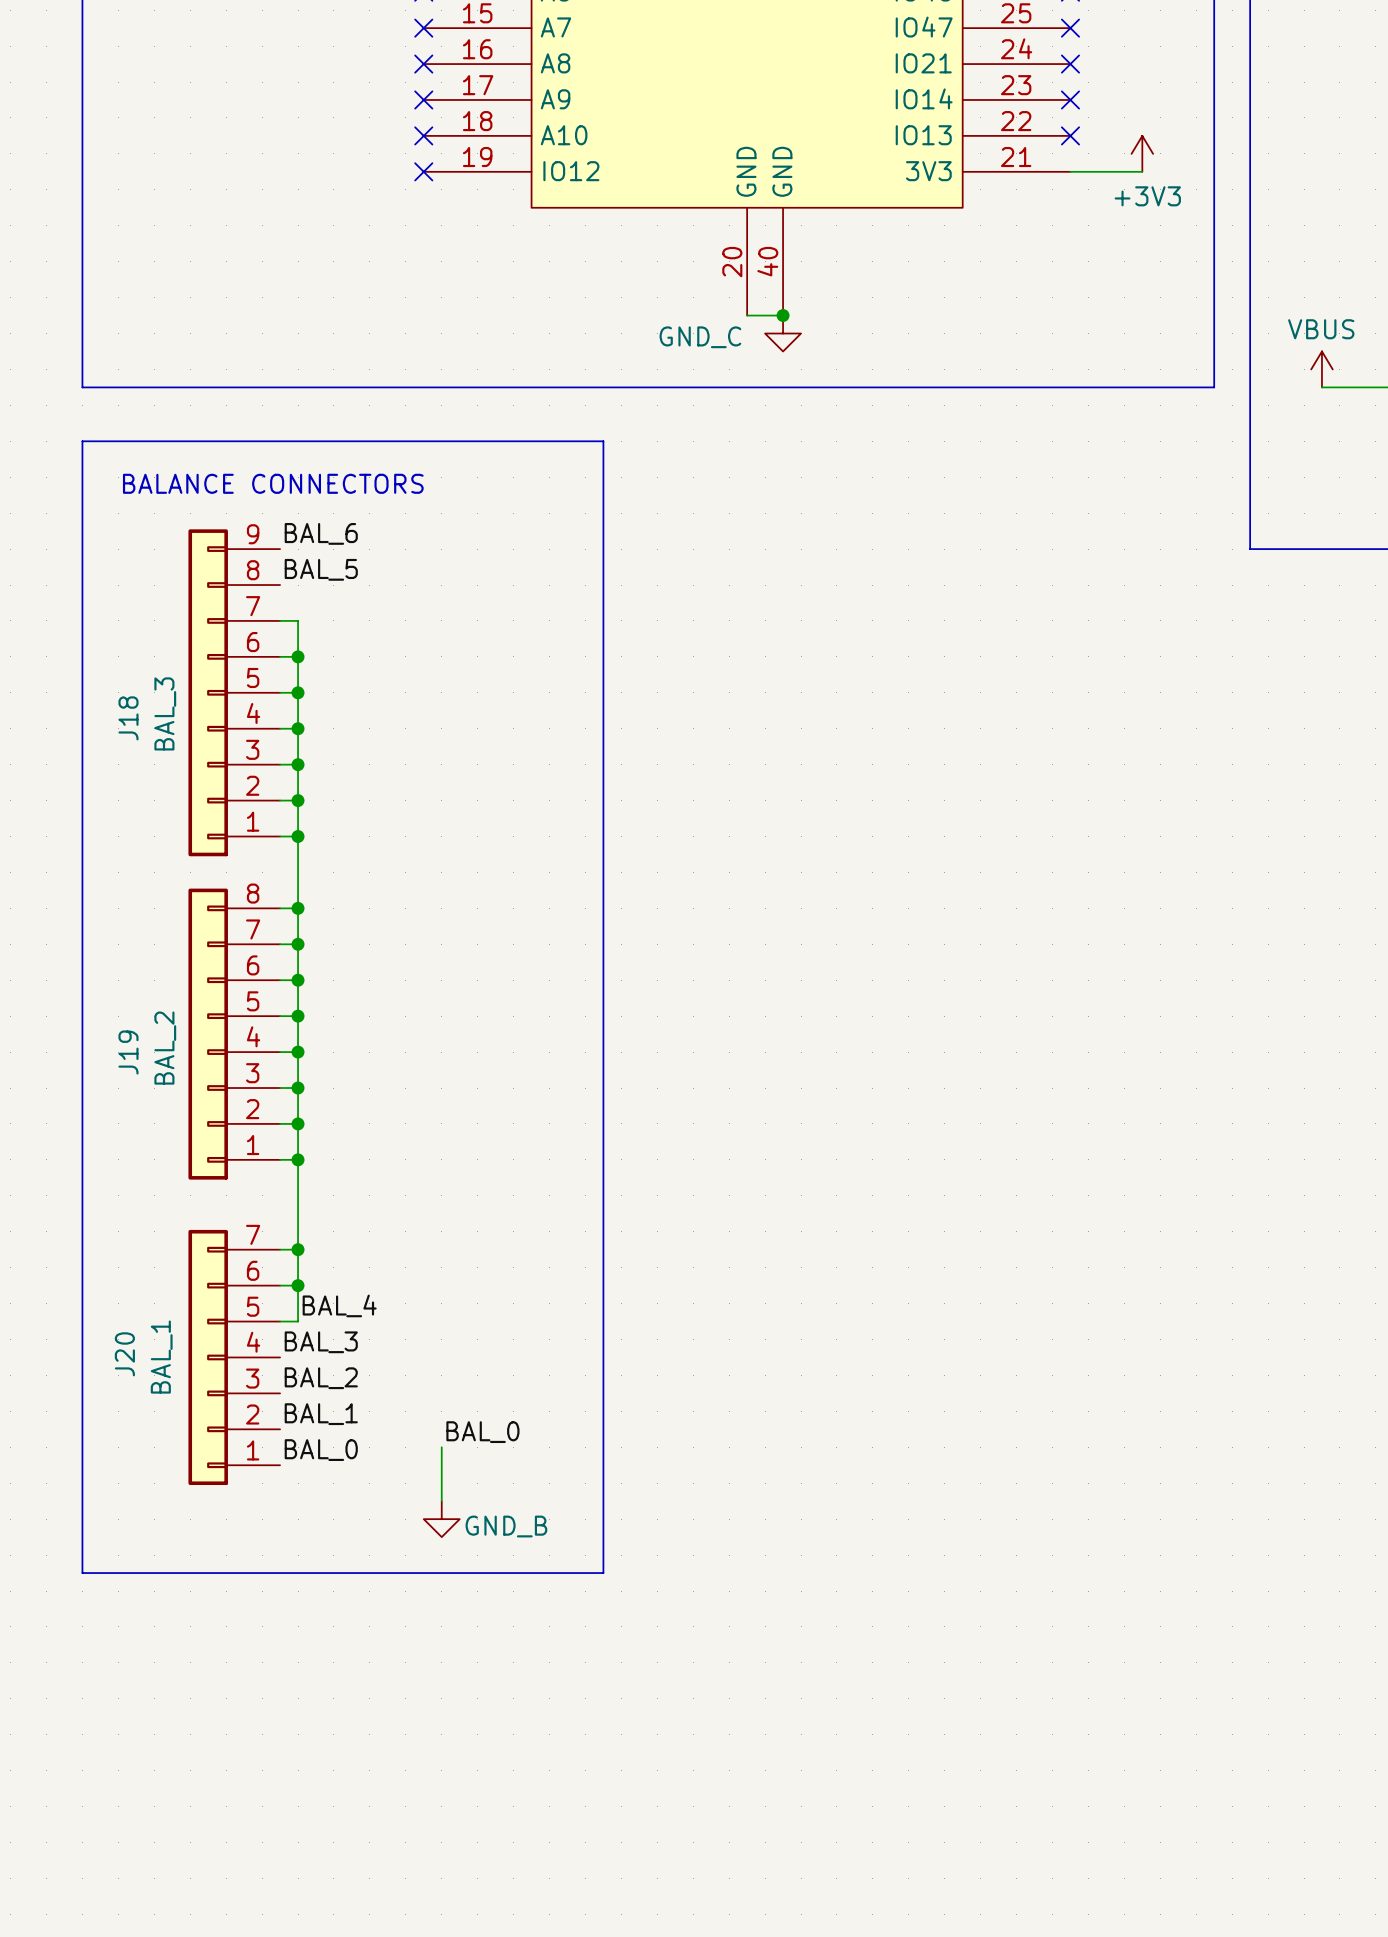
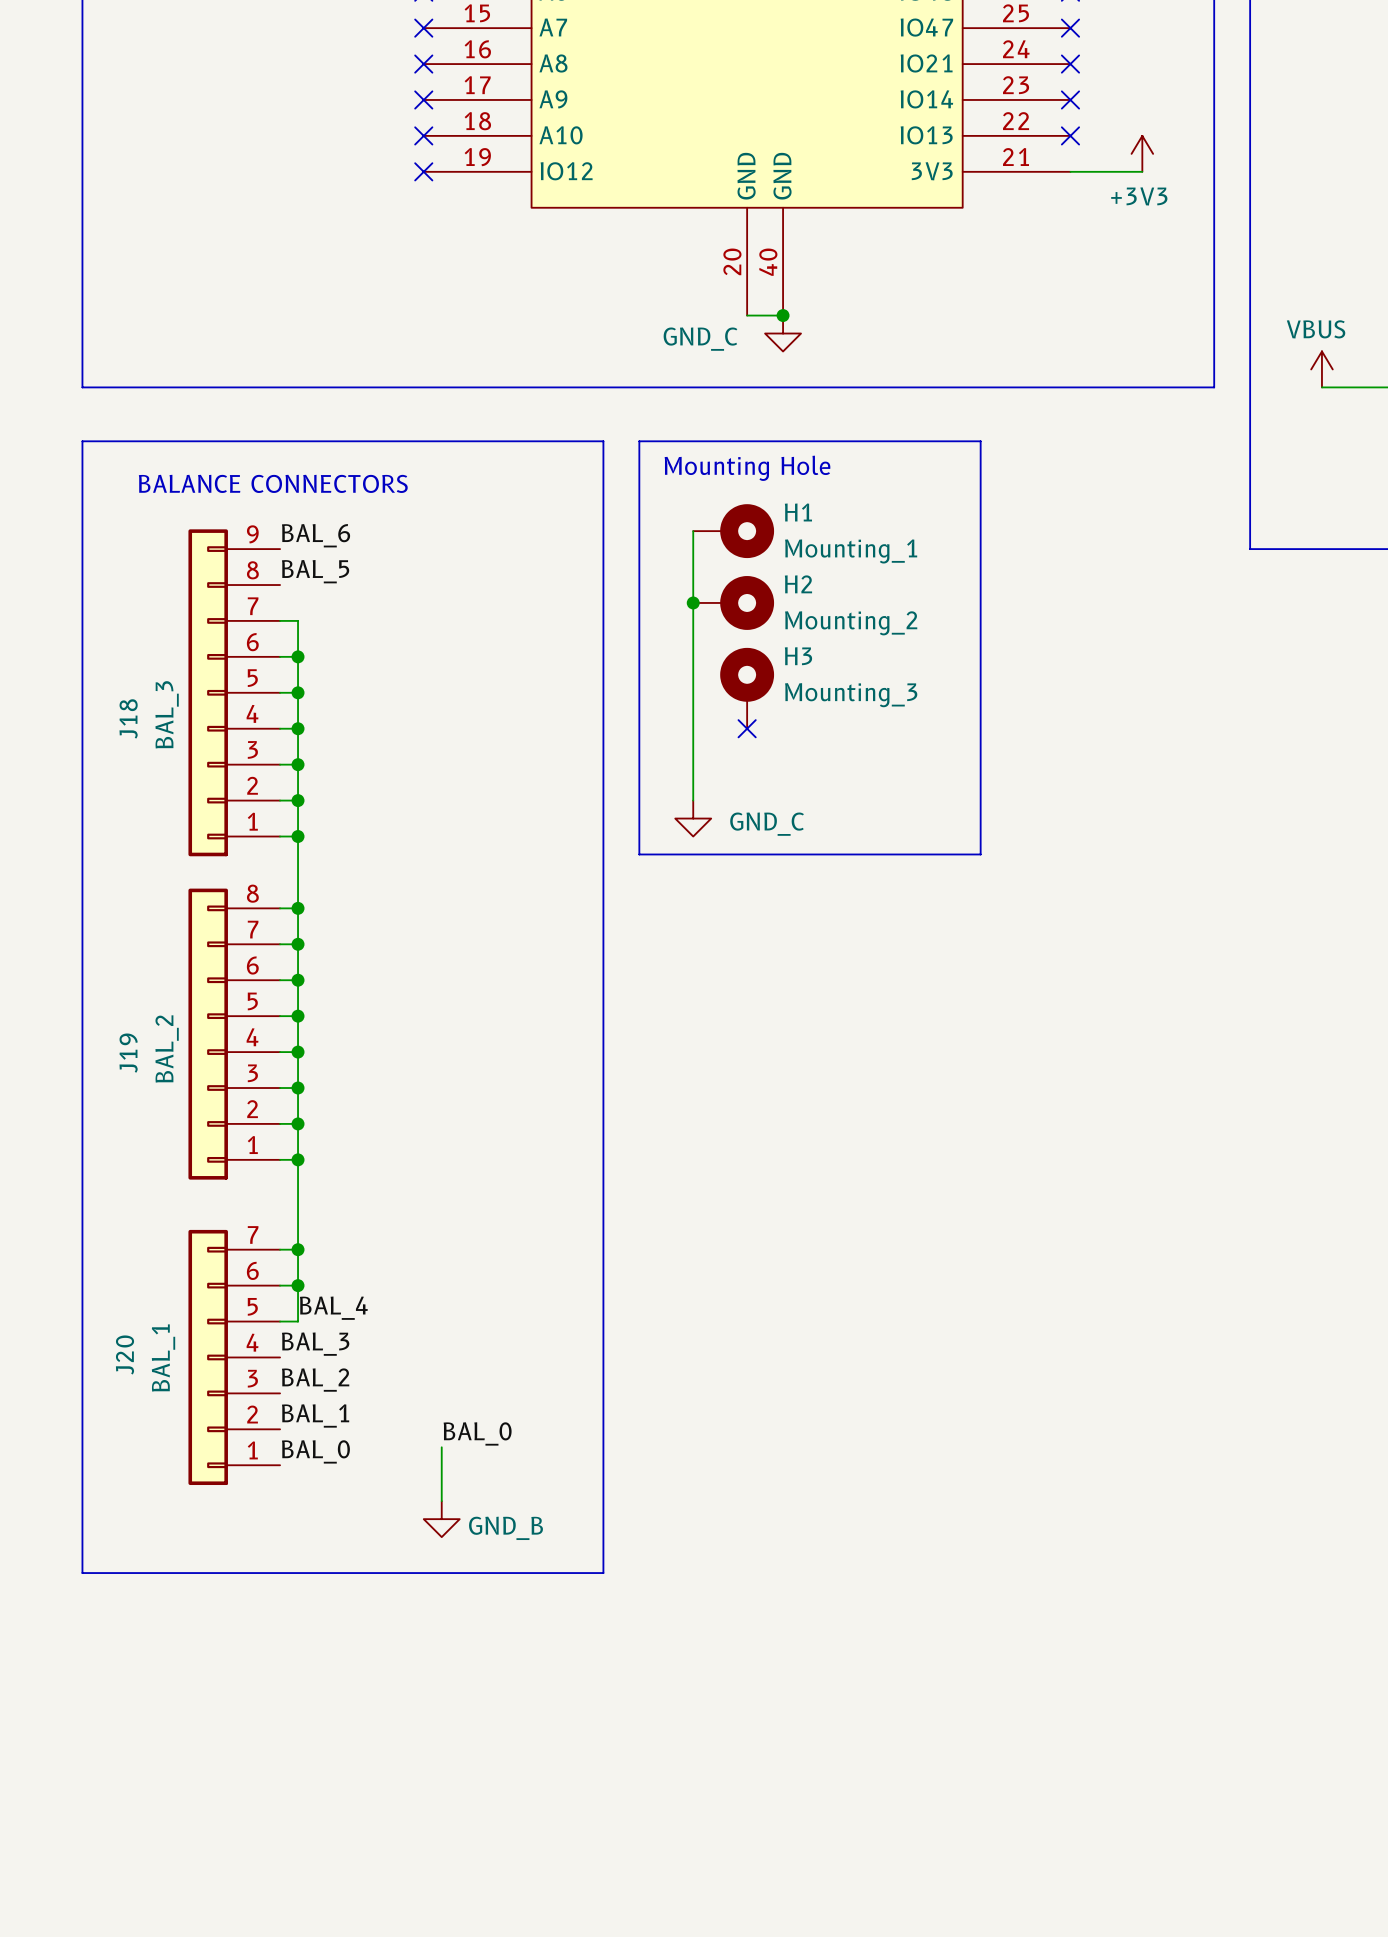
line: none -> (639, 441) (980, 441) (980, 854) (639, 854) (639, 441)
text: none -> Mounting Hole (747, 468)
wire: none -> (693, 531) (693, 800)
H1: none -> Mounting_1 (733, 531)
junction: none -> (693, 602)
H2: none -> Mounting_2 (733, 602)
H3: none -> Mounting_3 (747, 688)
no-connect mark: none -> (747, 728)
power symbol: none -> GND_C (693, 818)

